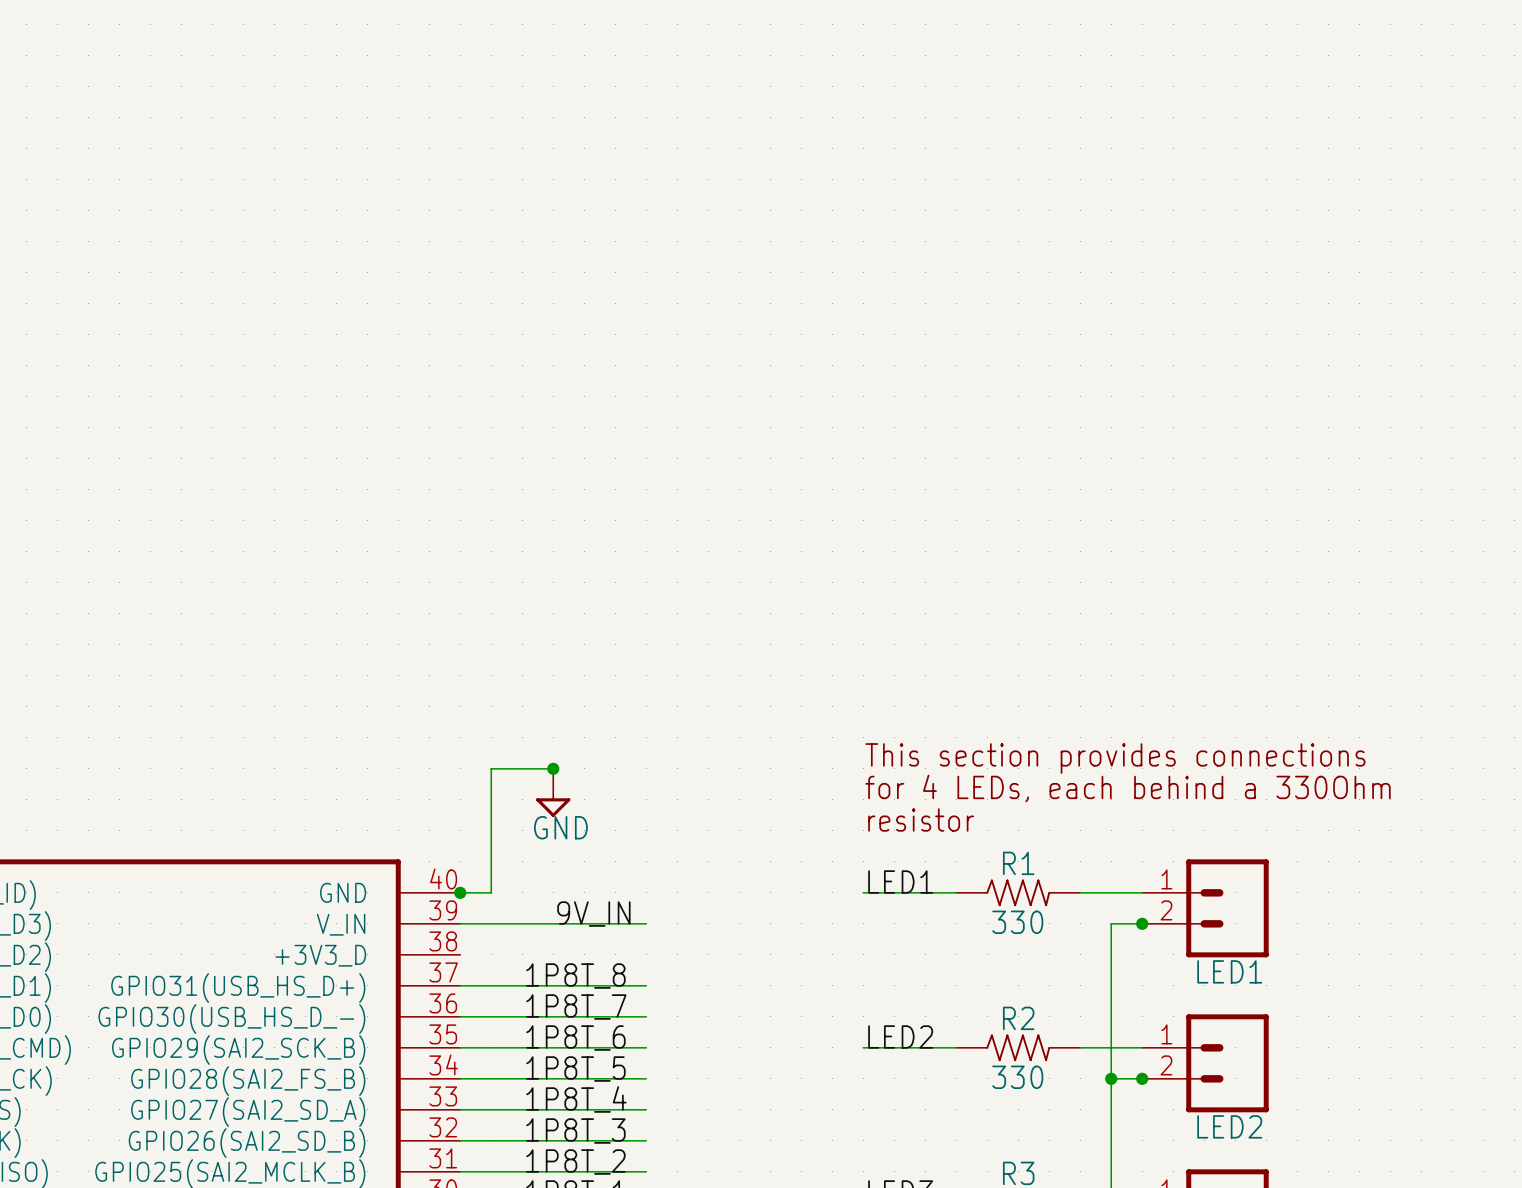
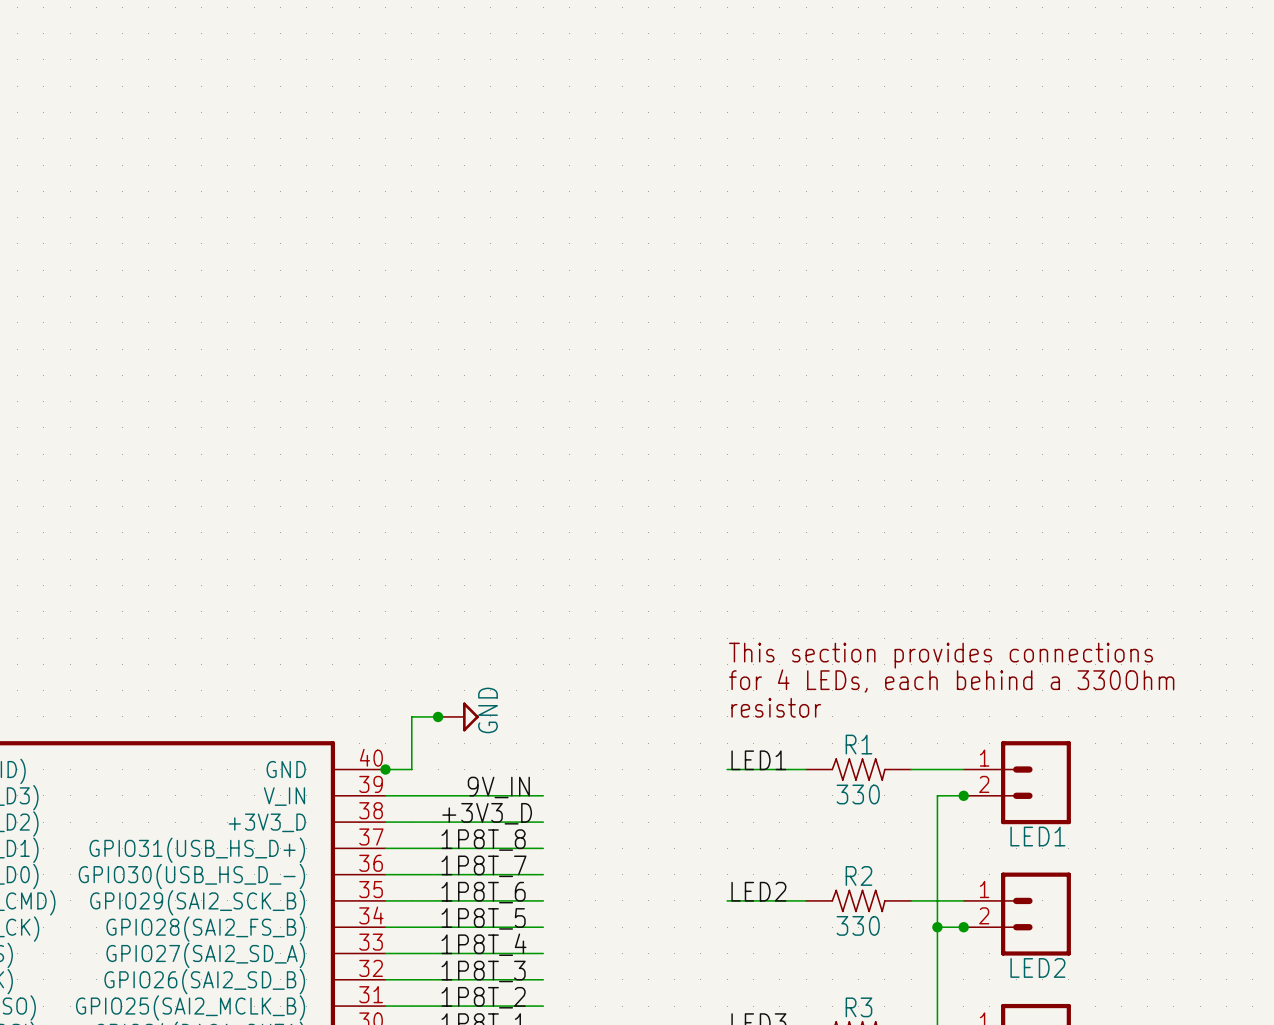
wire: (553, 768) (491, 768) (491, 830) -> (438, 716) (411, 716)
junction position: (553, 768) -> (438, 716)
power symbol position: GND (553, 792) -> GND (458, 716)
power symbol rotation: 0° (553, 807) -> 90° counterclockwise (470, 716)
label: none -> +3V3_D (487, 813)
wire: none -> (385, 822) (543, 822)

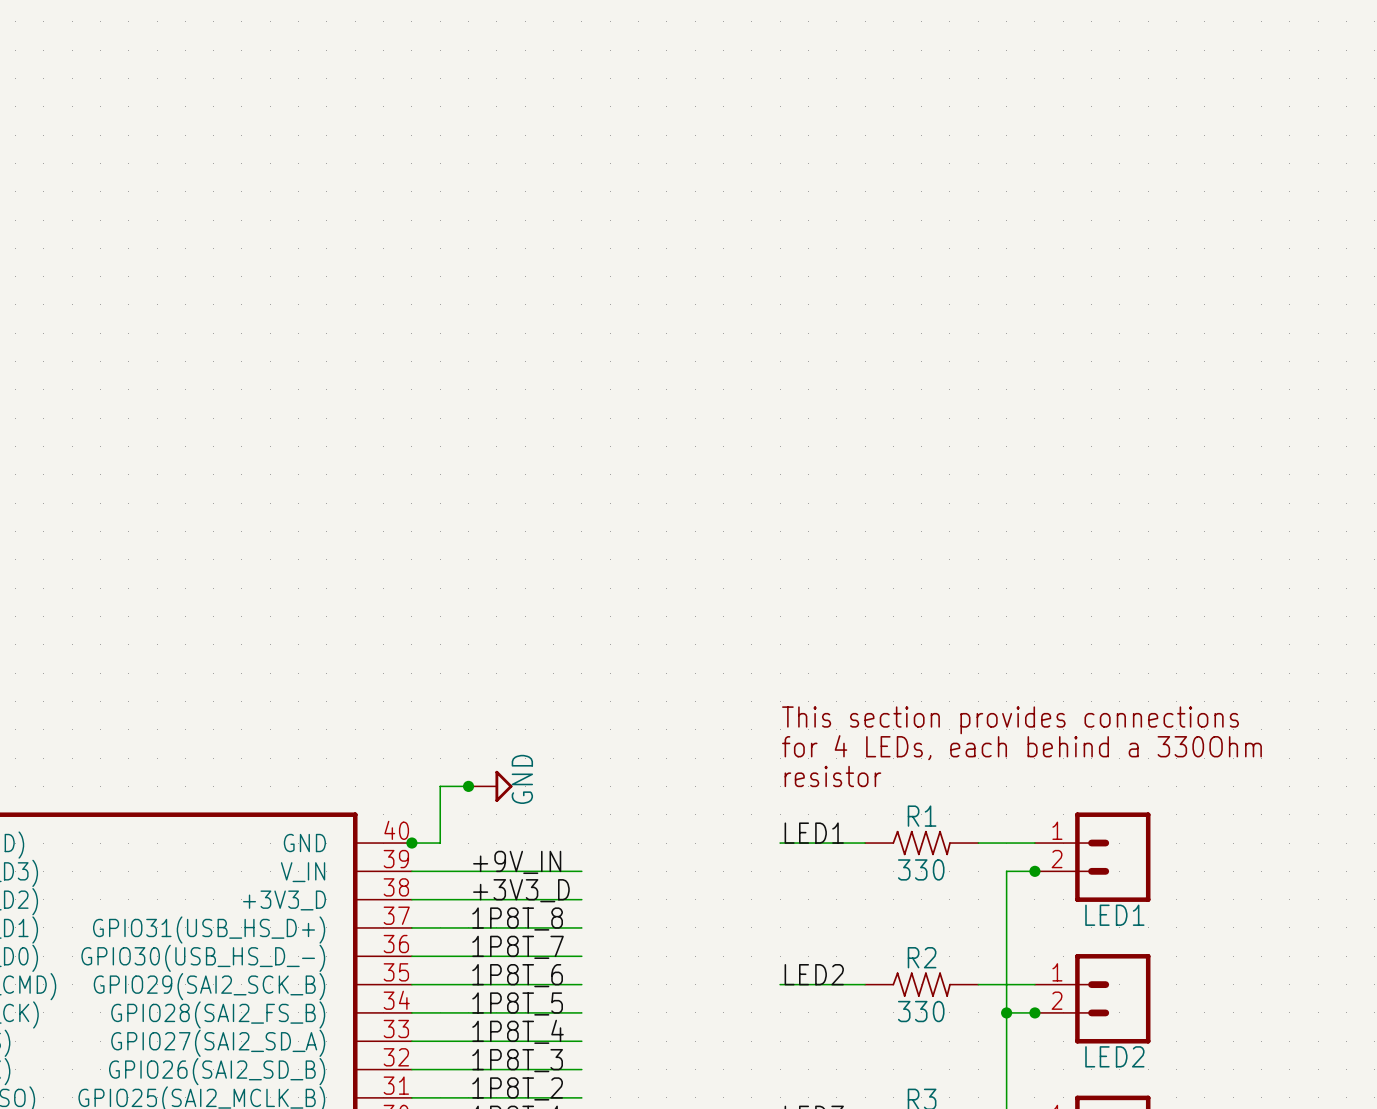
label: 9V_IN (498, 787) -> +9V_IN (517, 862)

